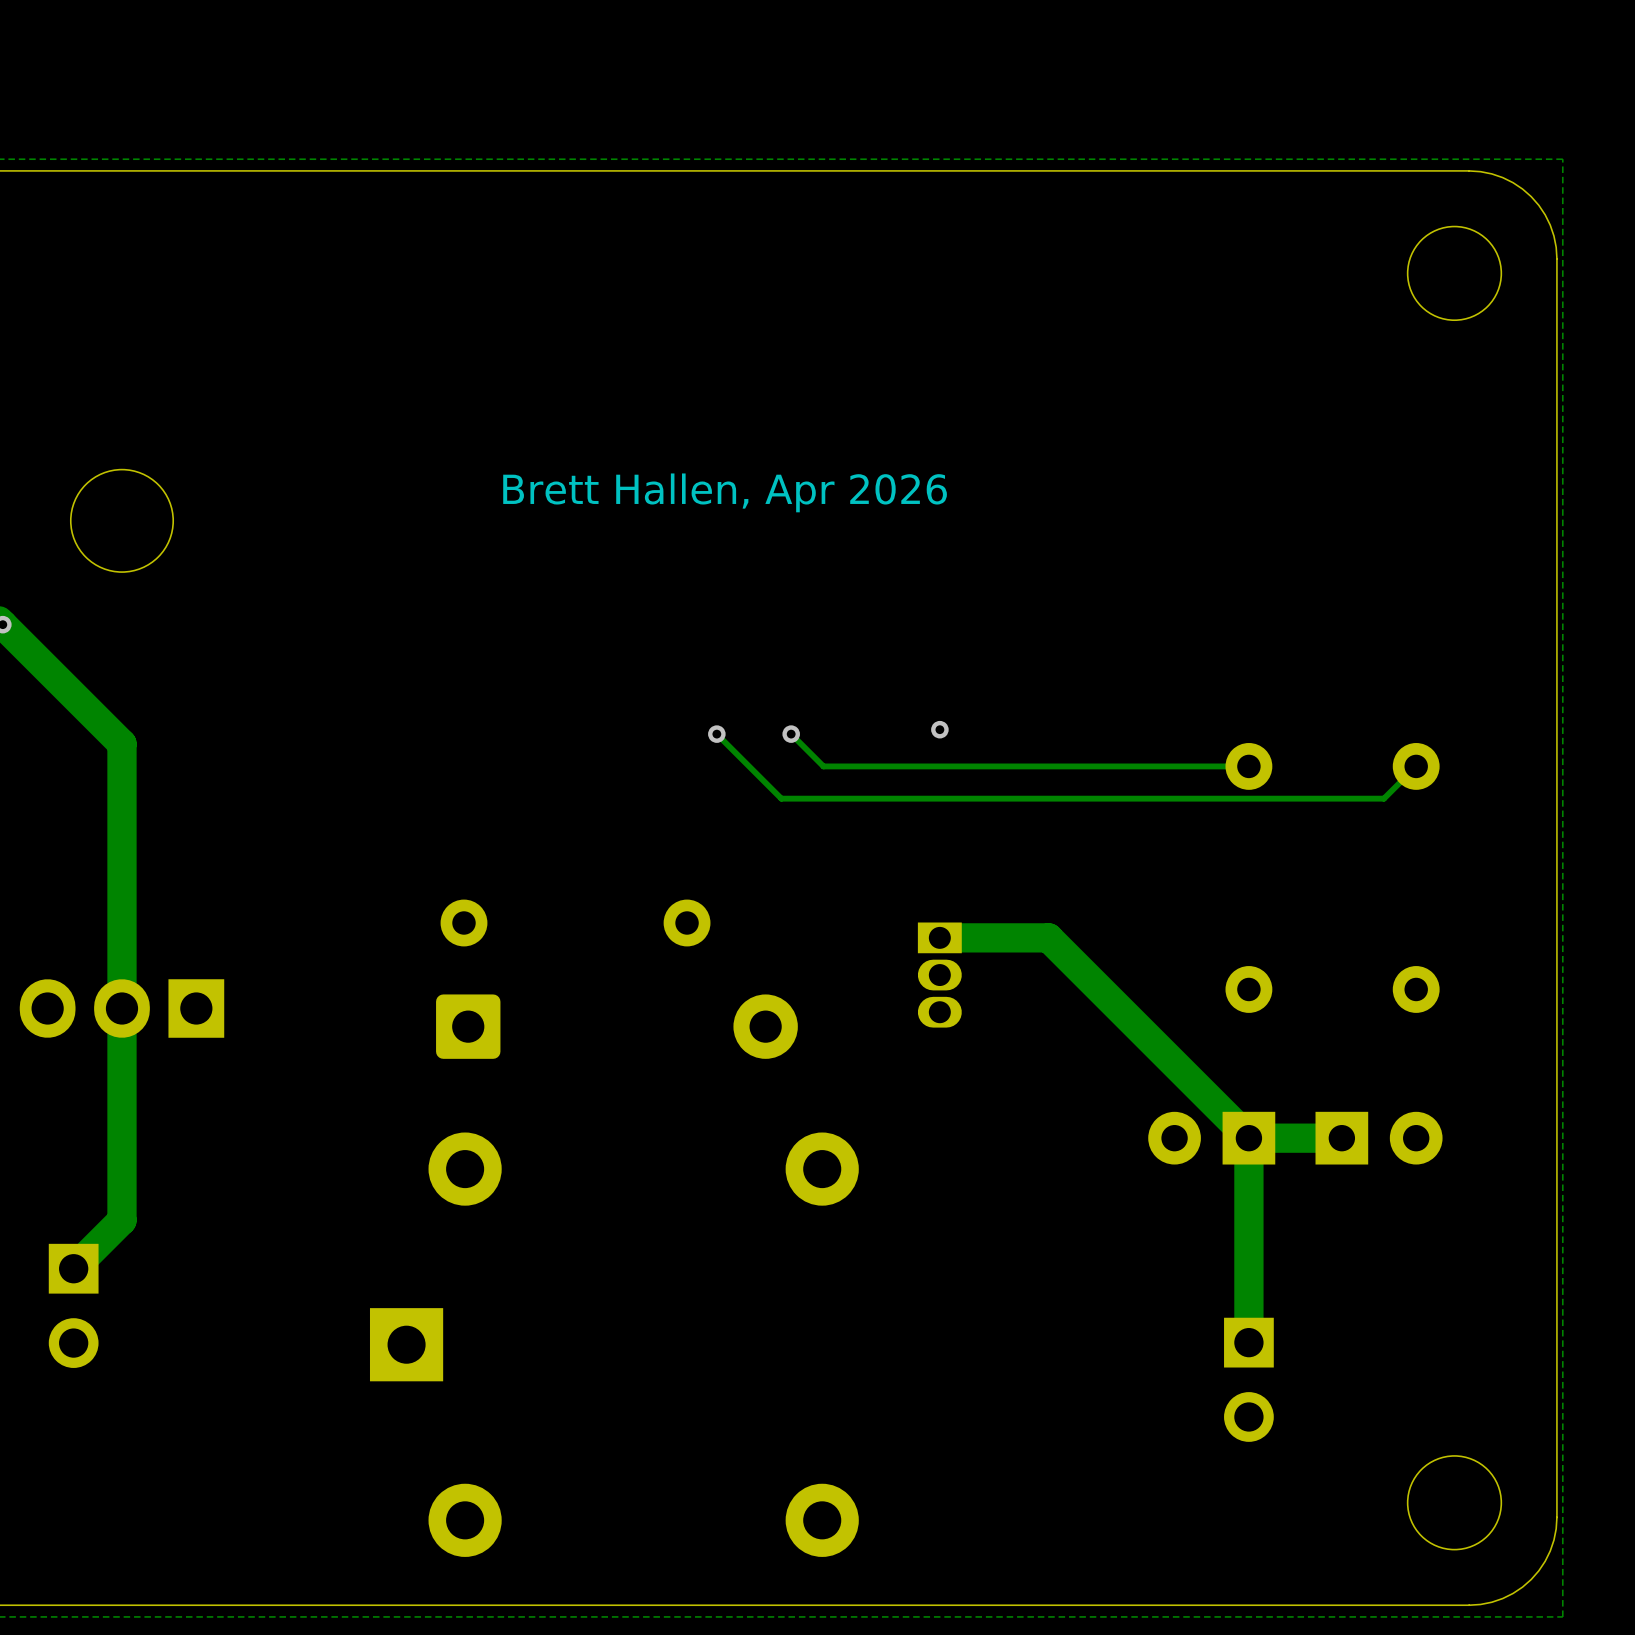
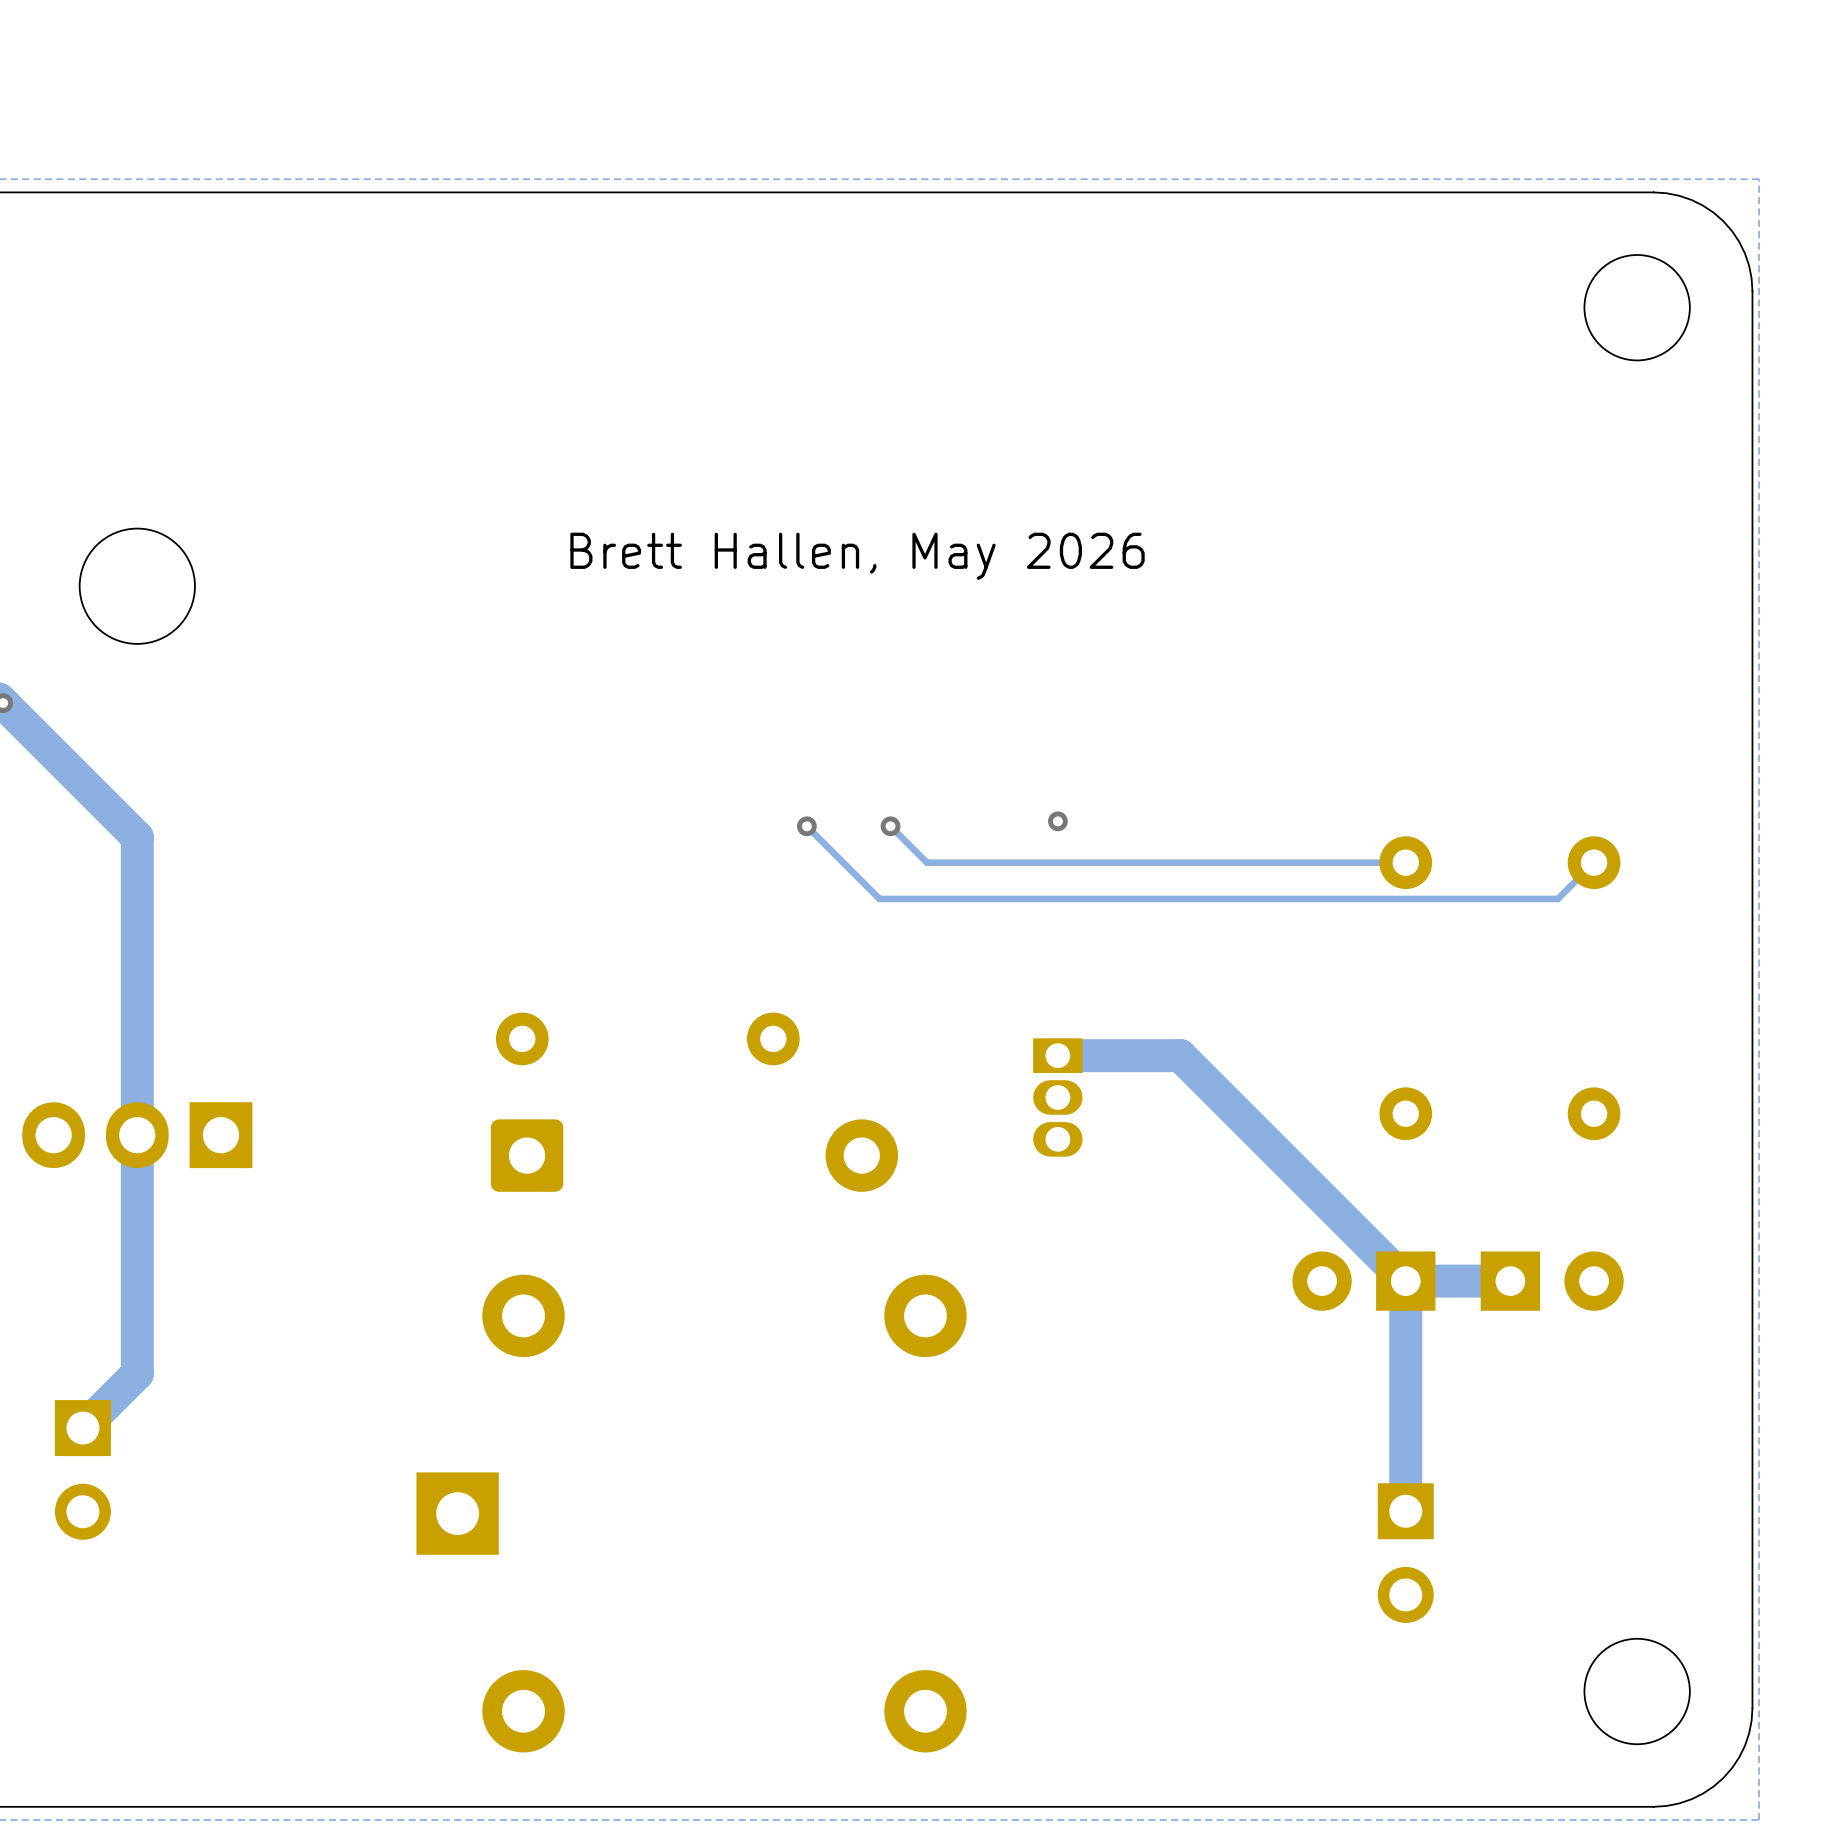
text: Brett Hallen, Apr 2026 (725, 492) -> Brett Hallen, May 2026 (857, 556)

